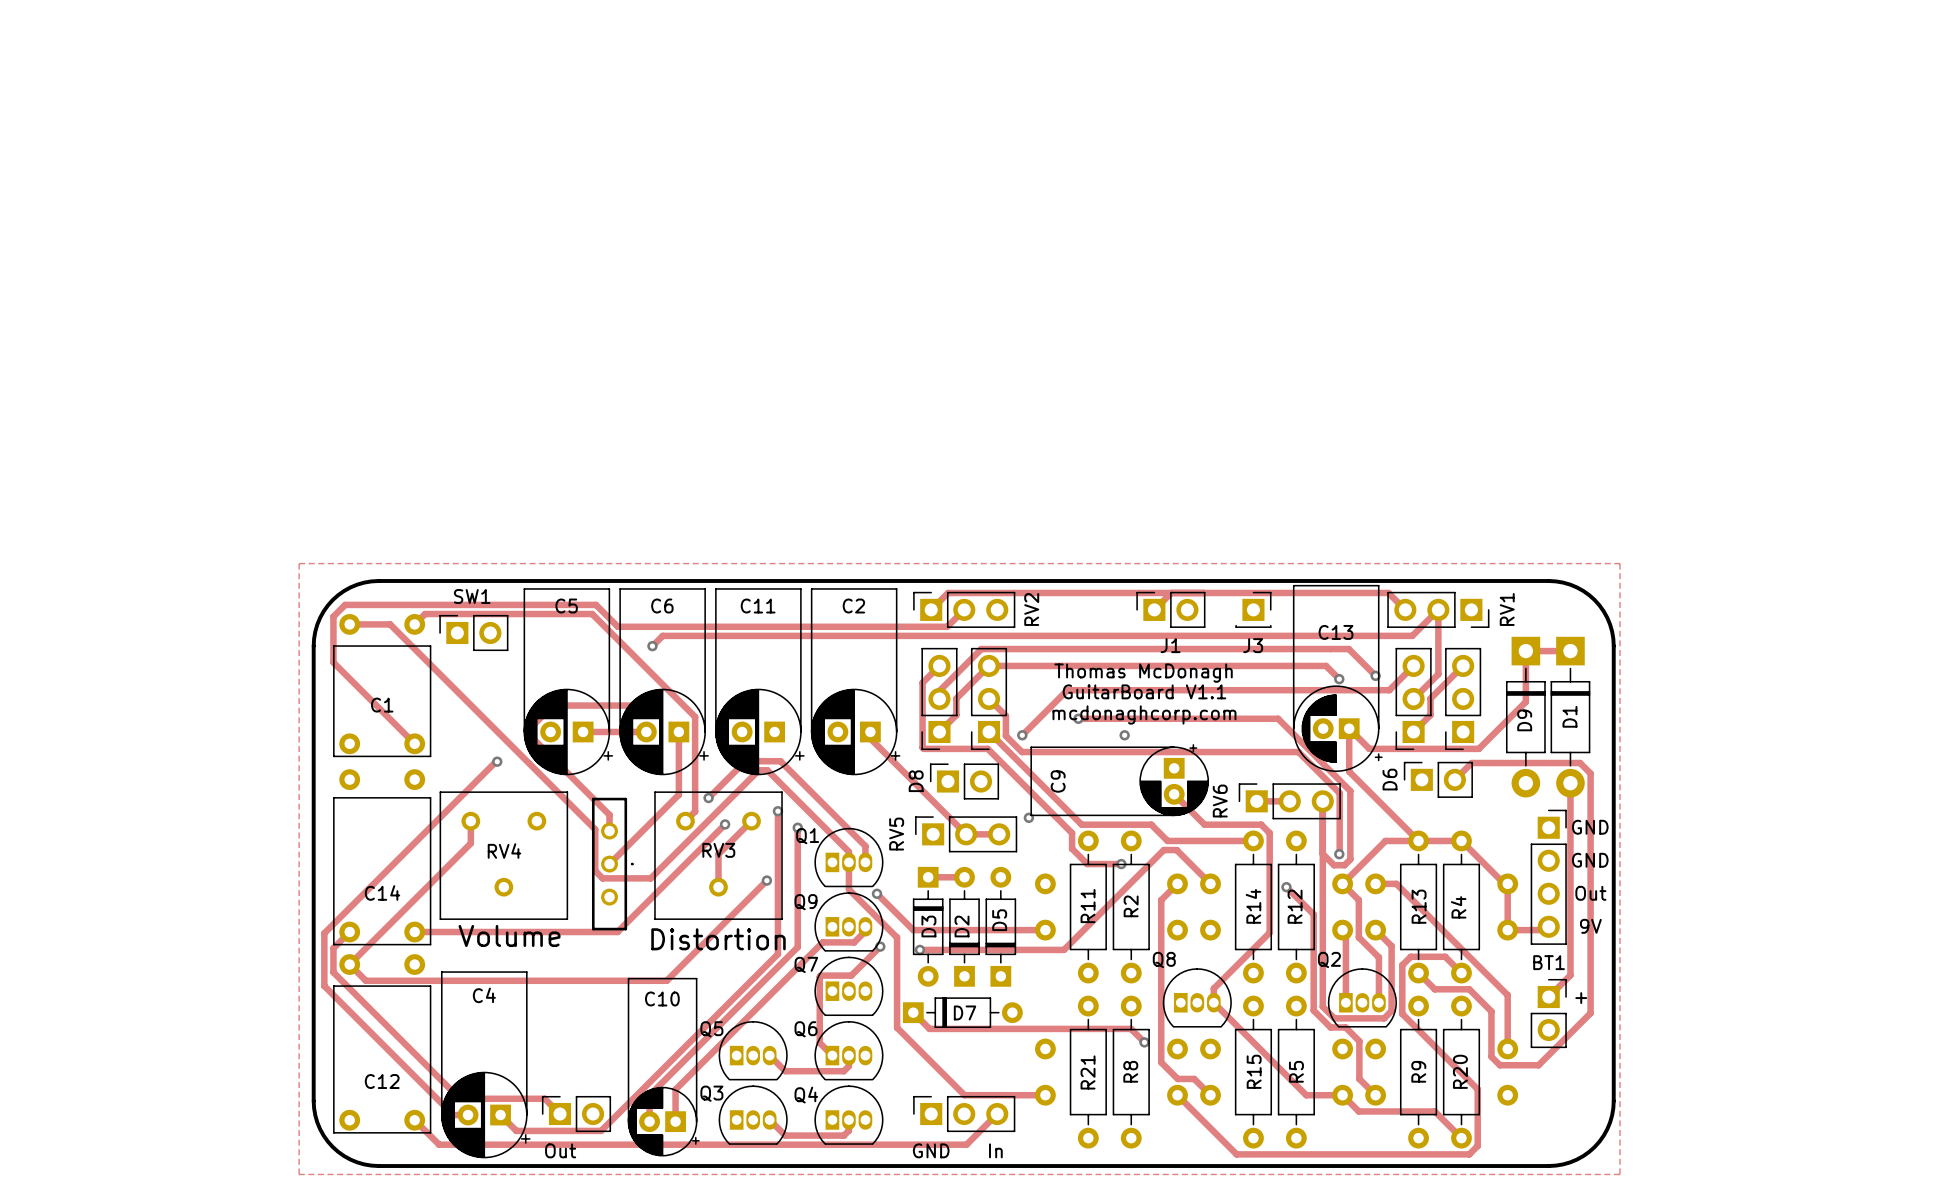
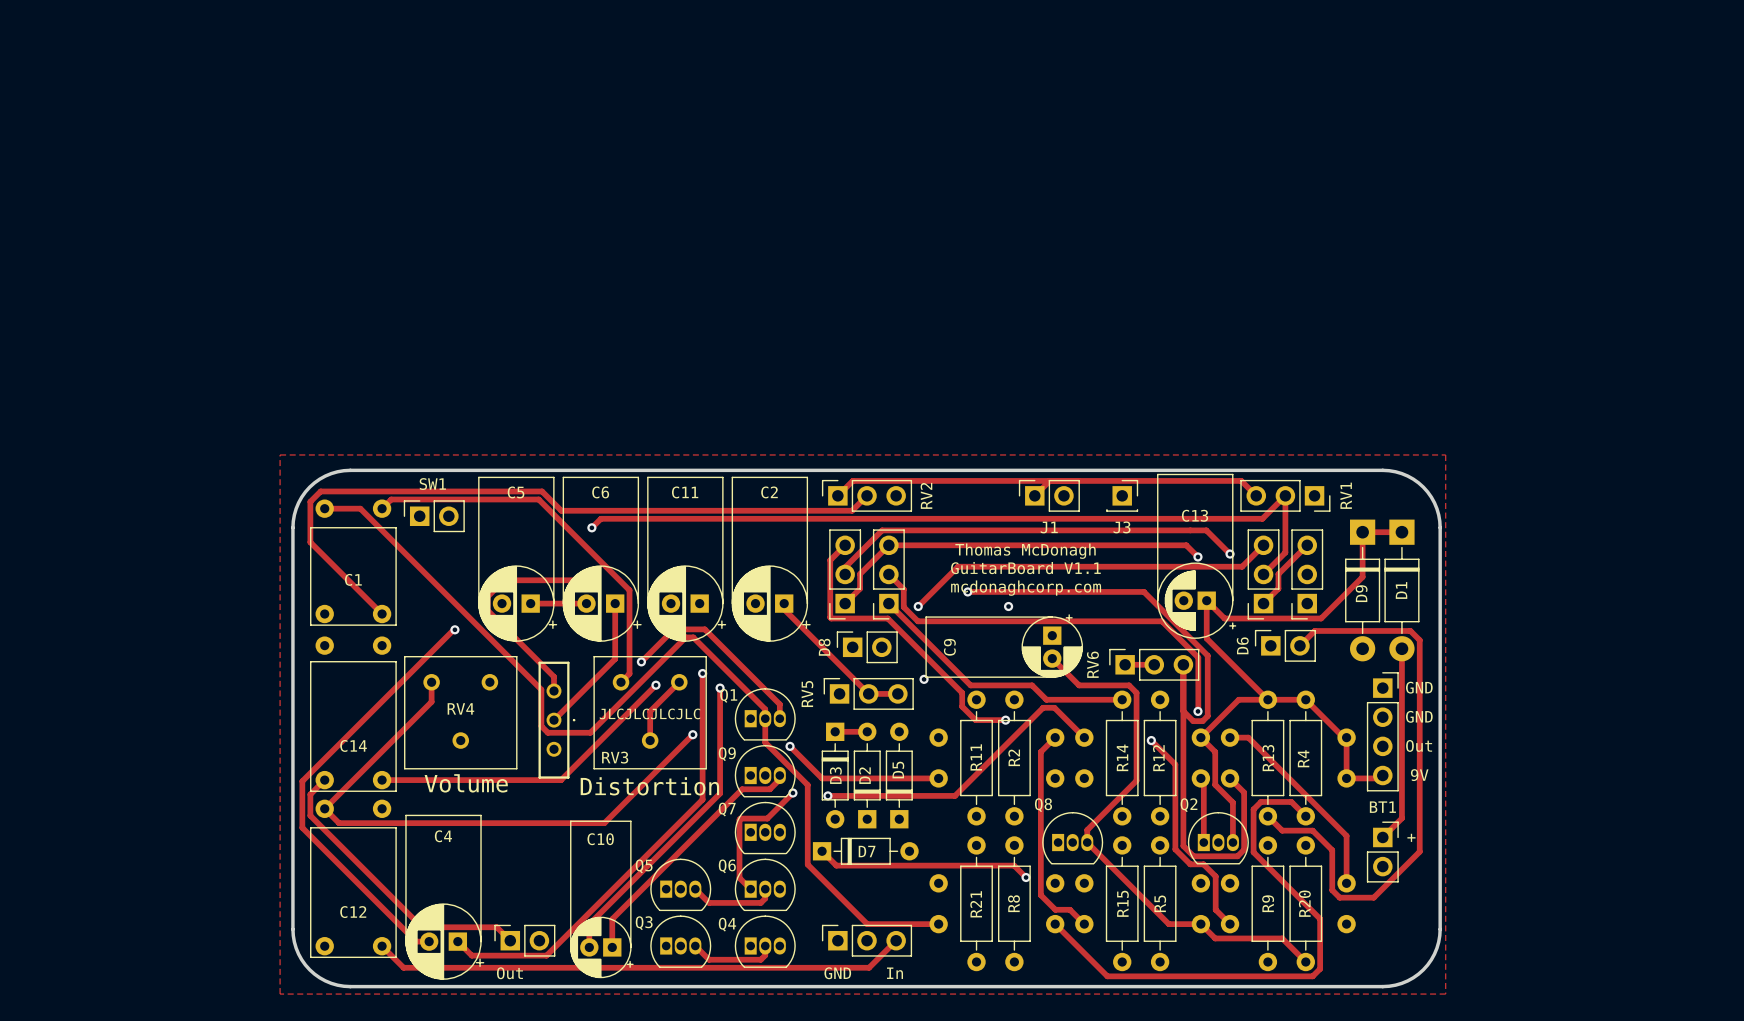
RV3 name position: RV3 (718, 850) -> RV3 (615, 757)
text: none -> JLCJLCJLCJLC (649, 713)

